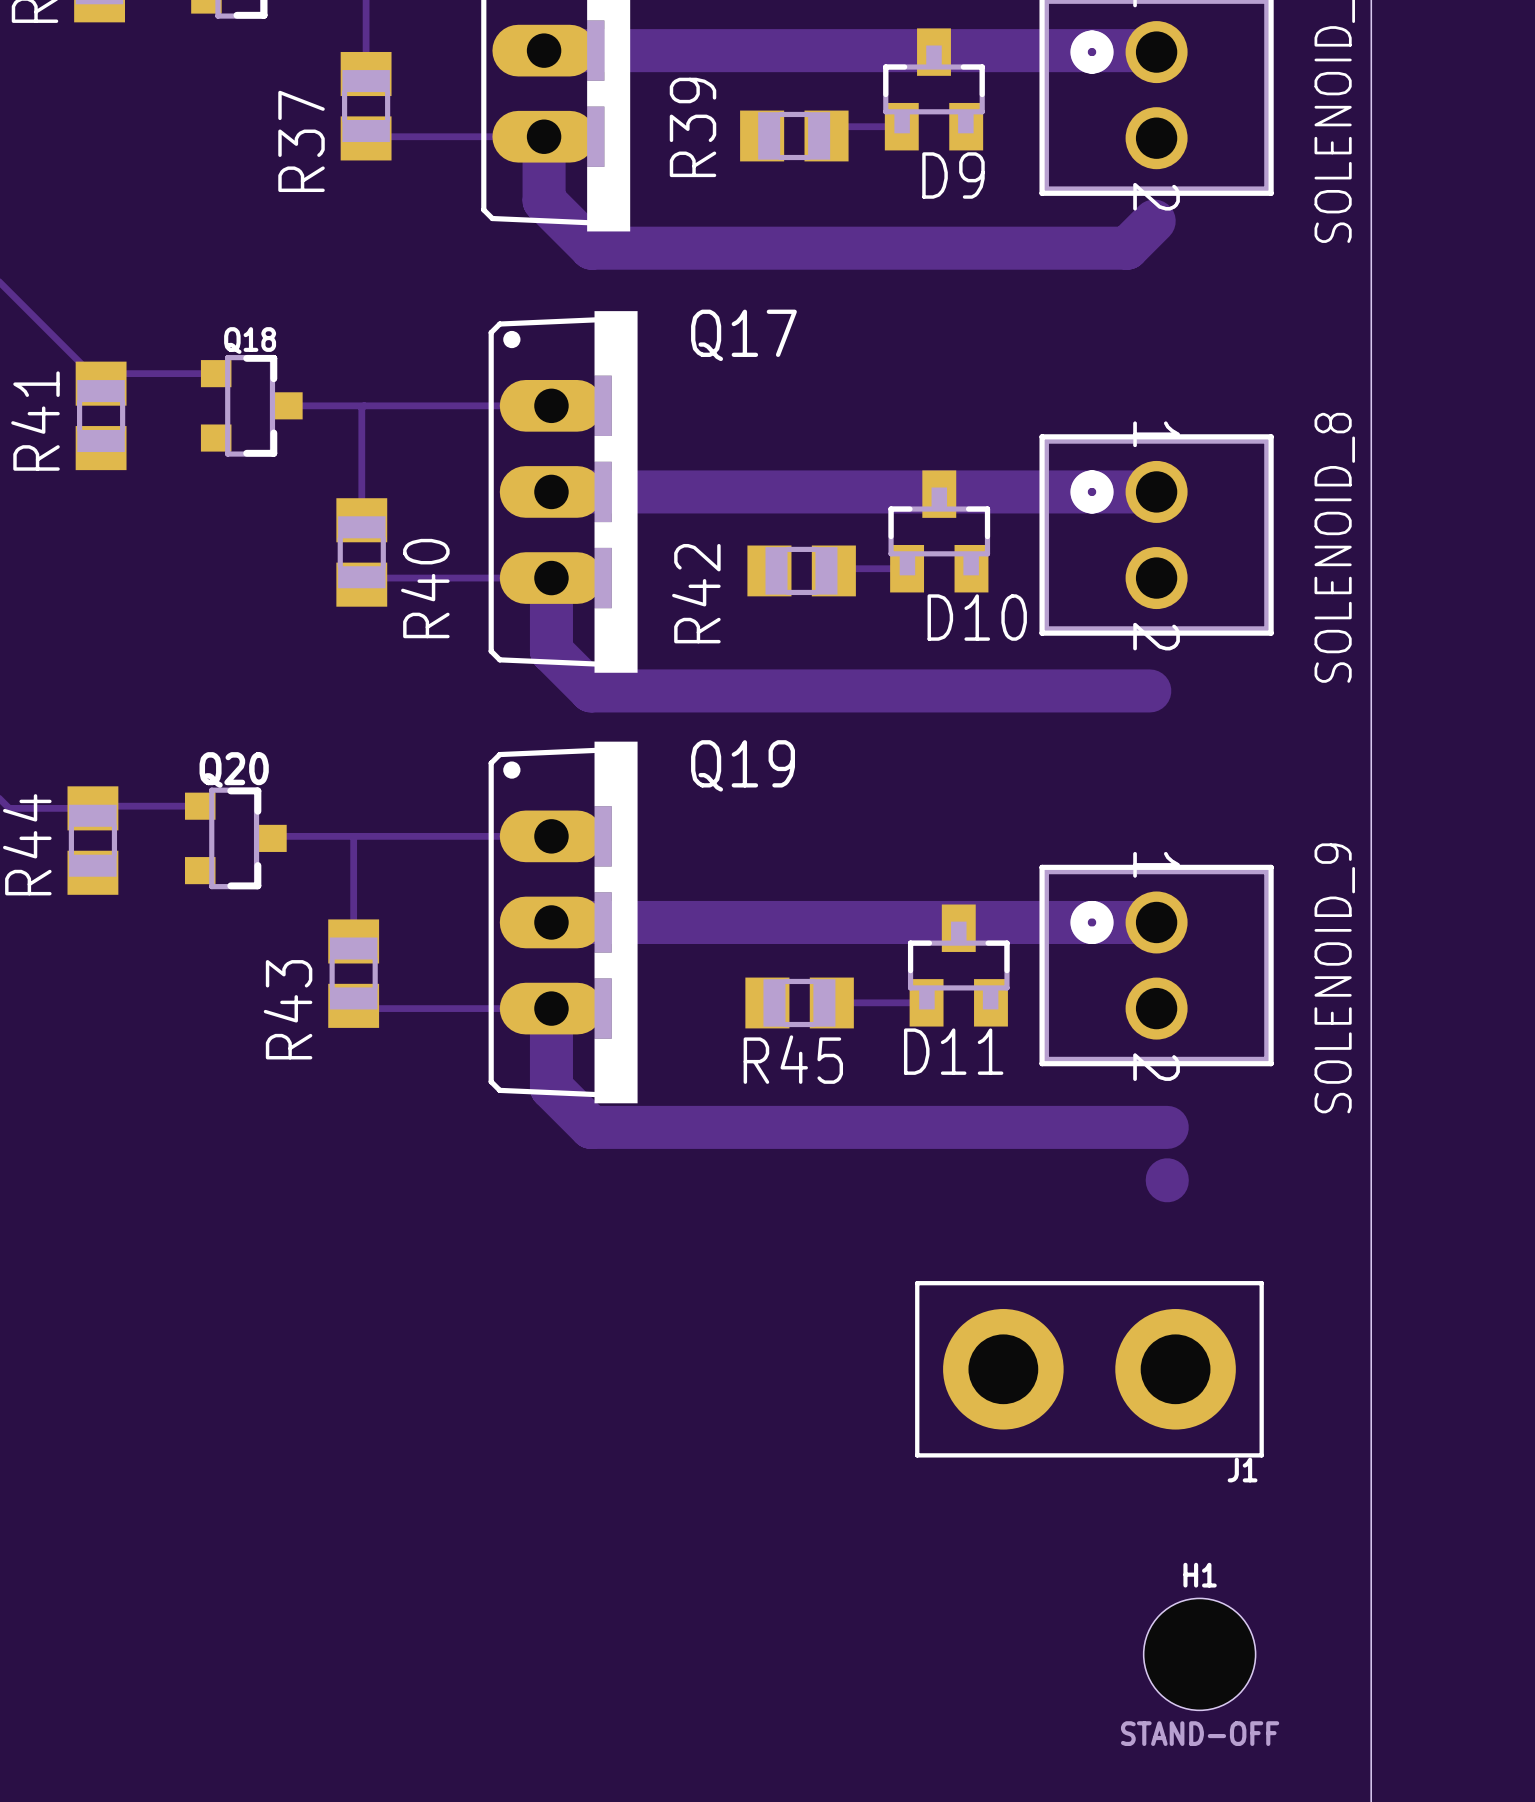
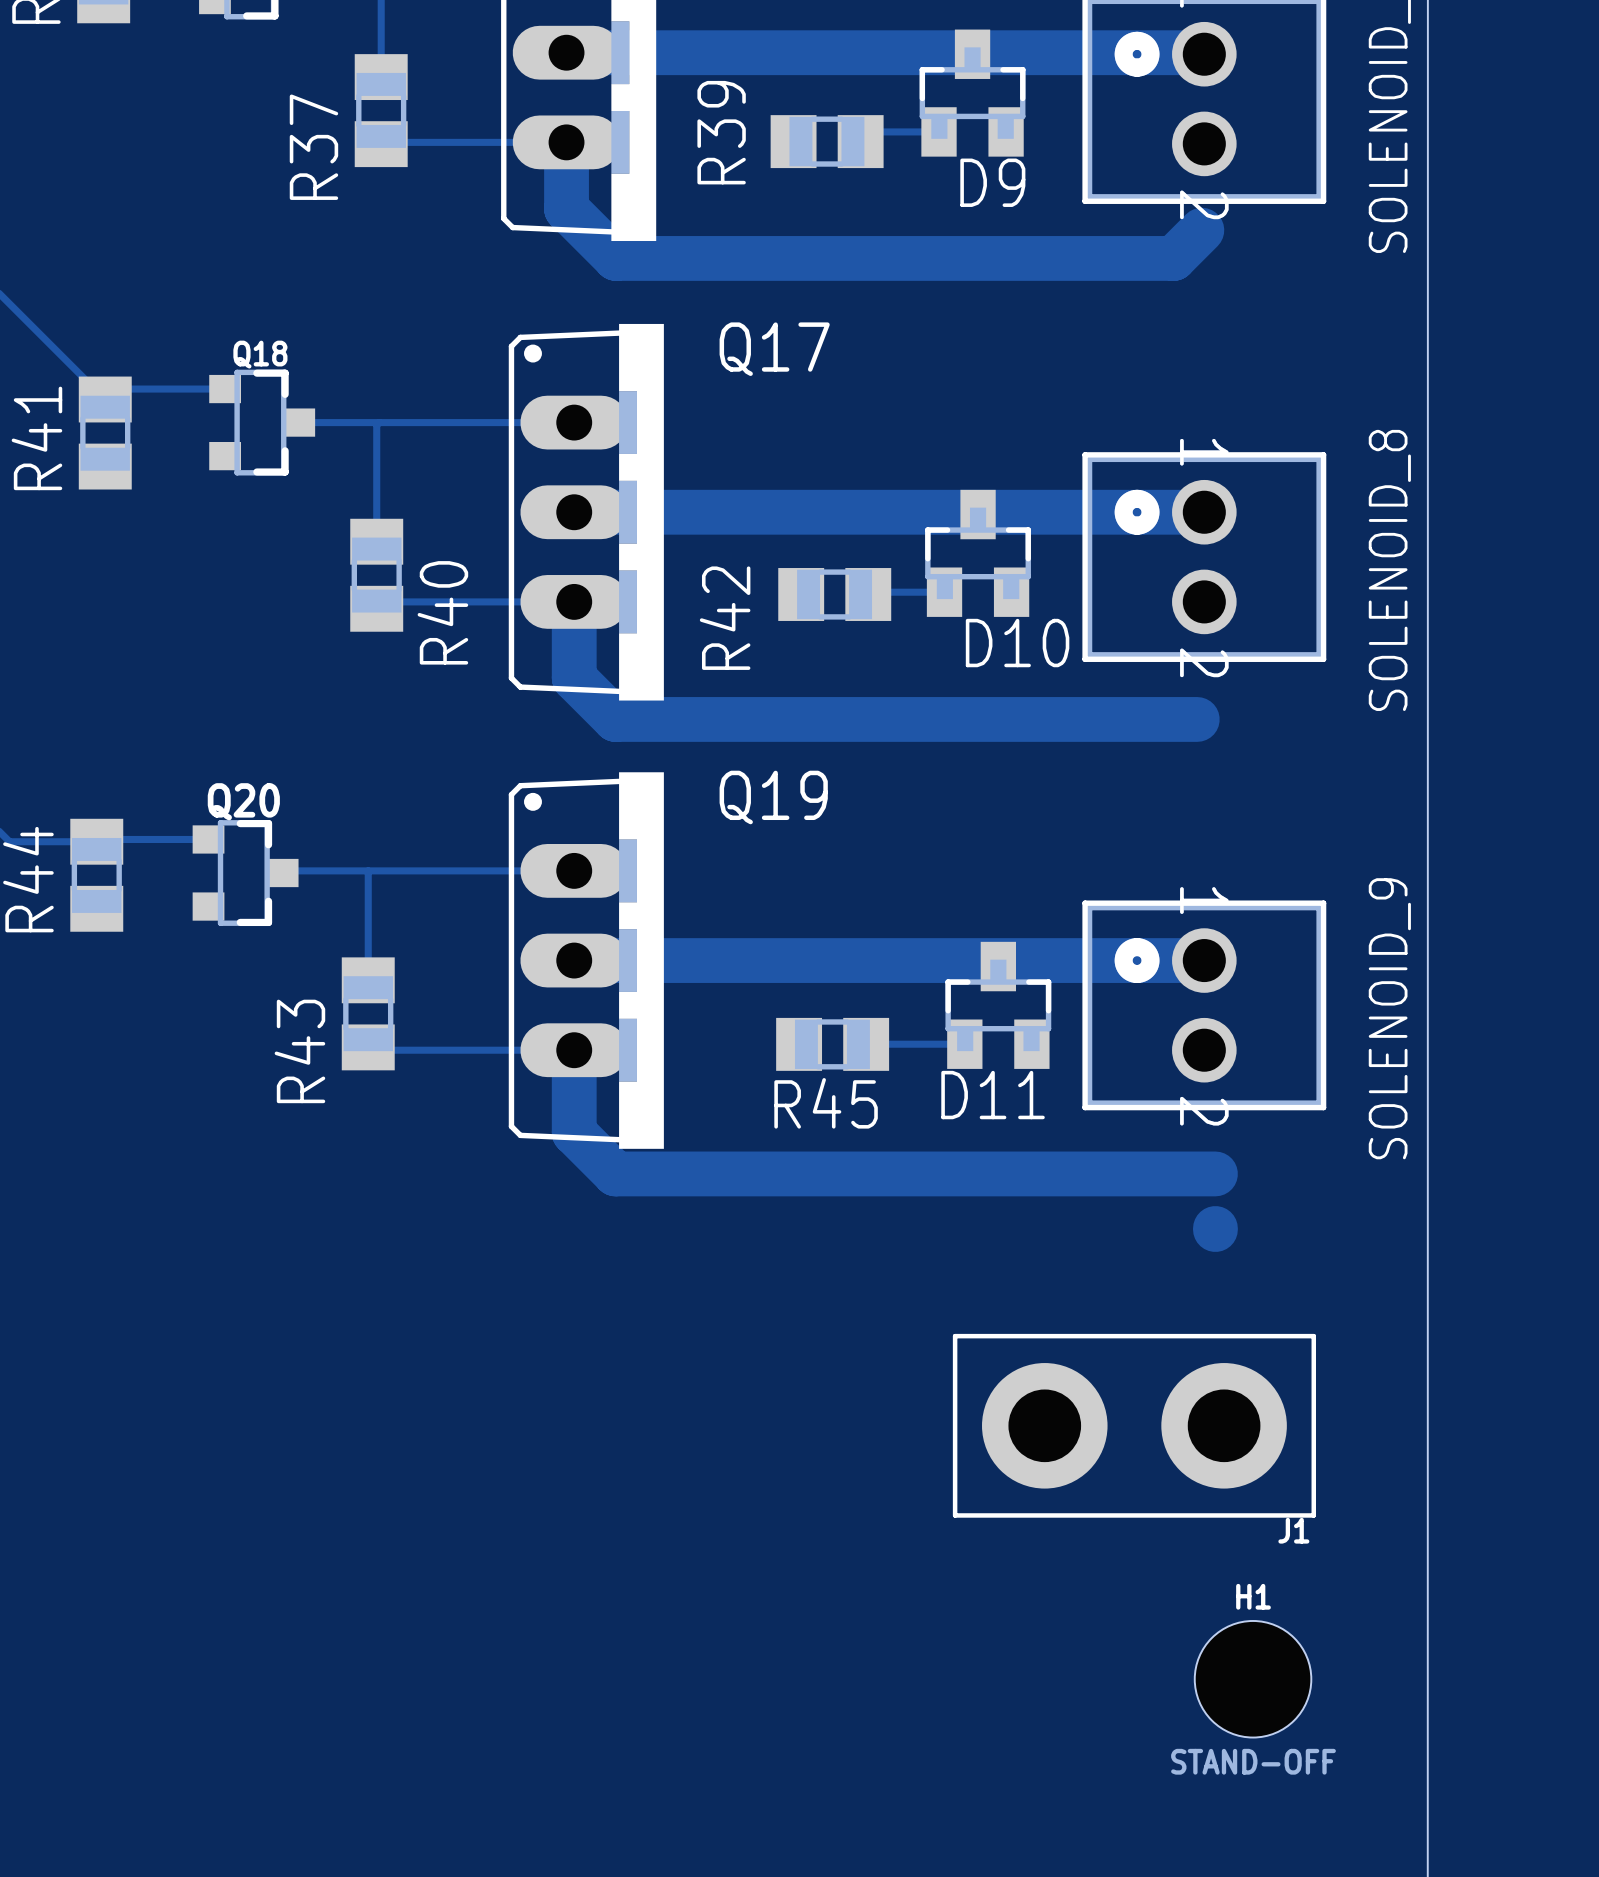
H1 position: (1199, 1654) -> (1253, 1679)

